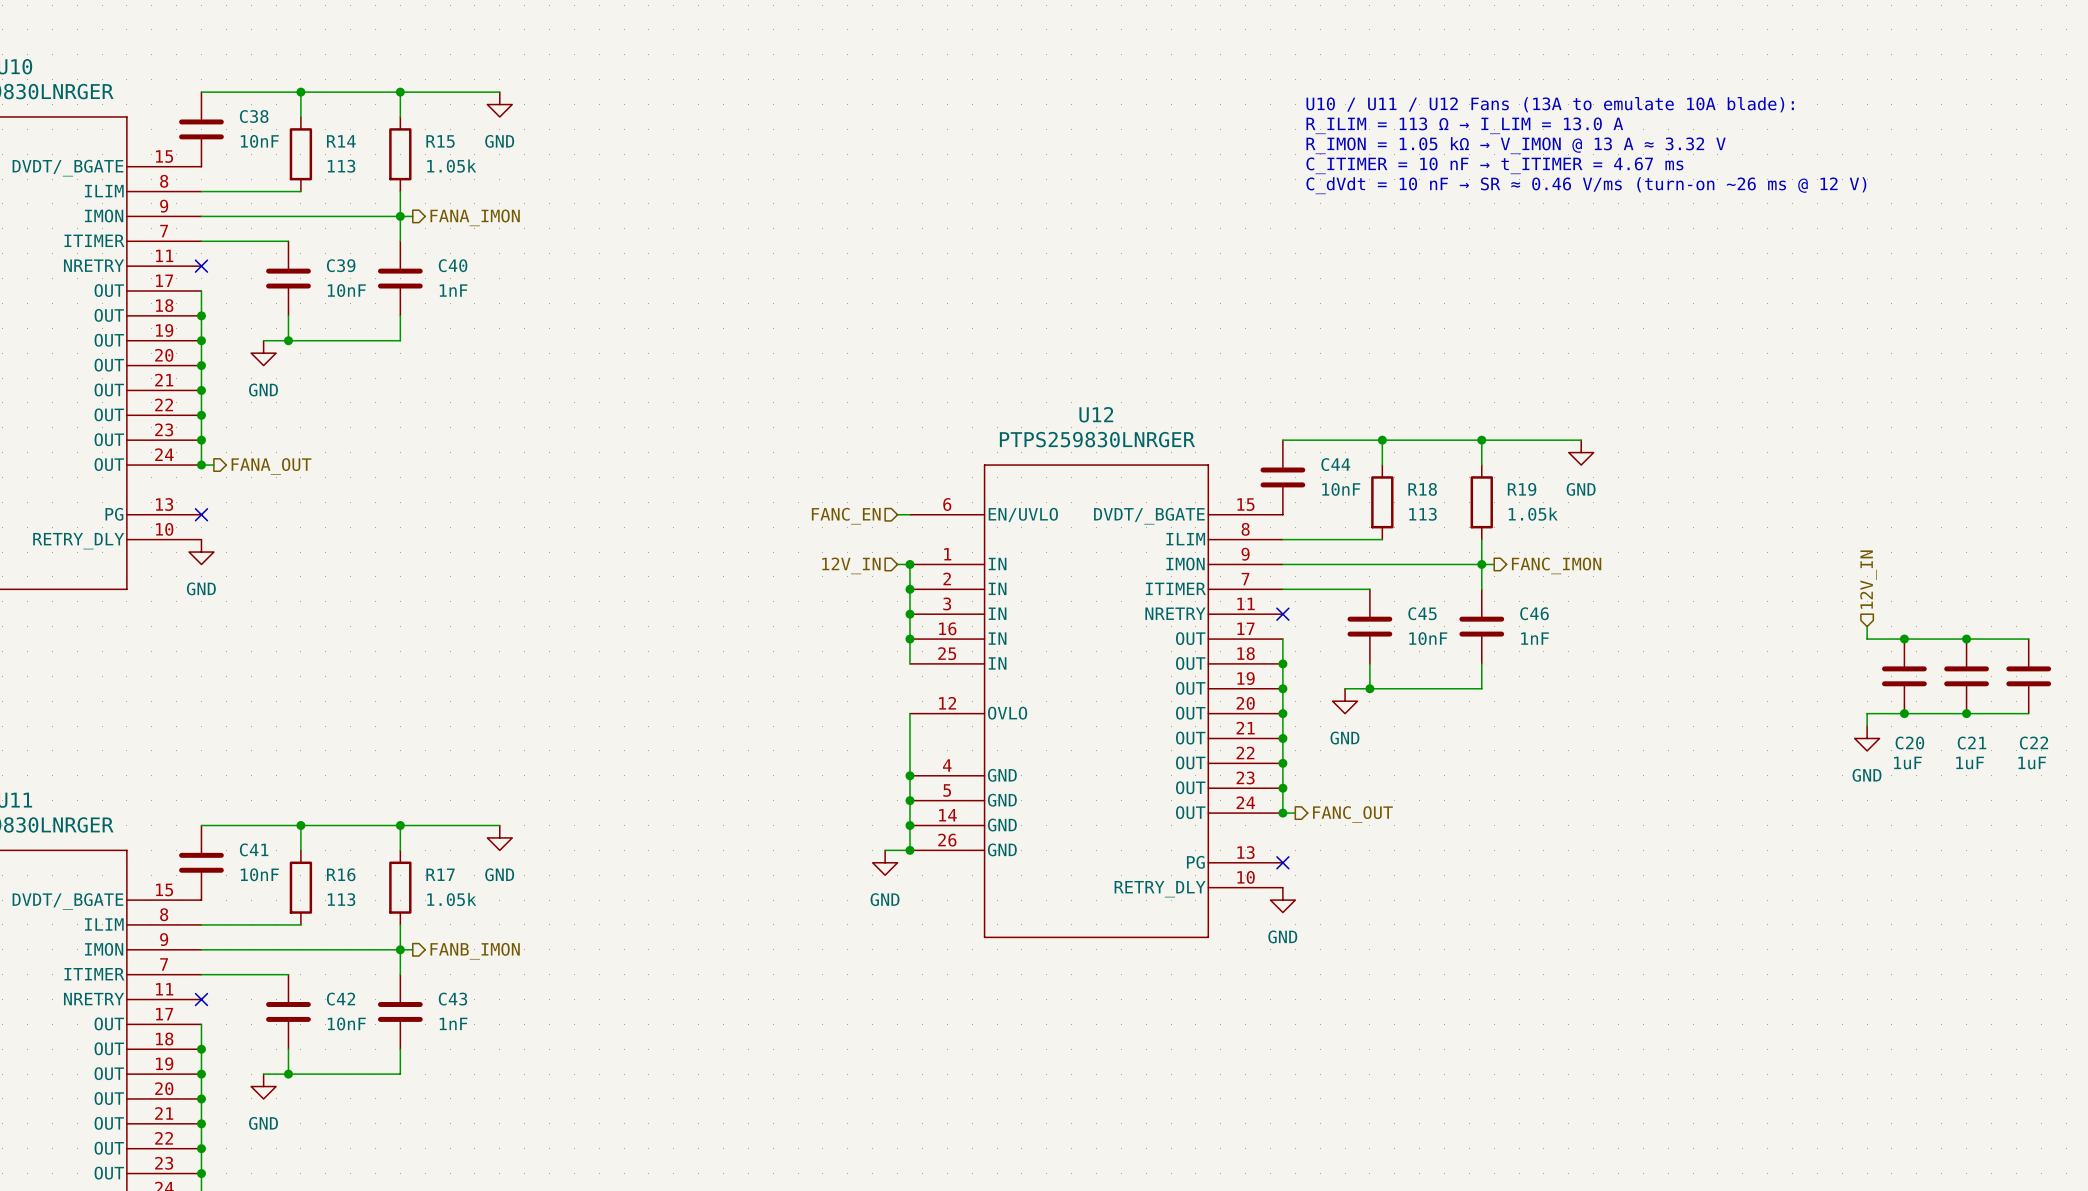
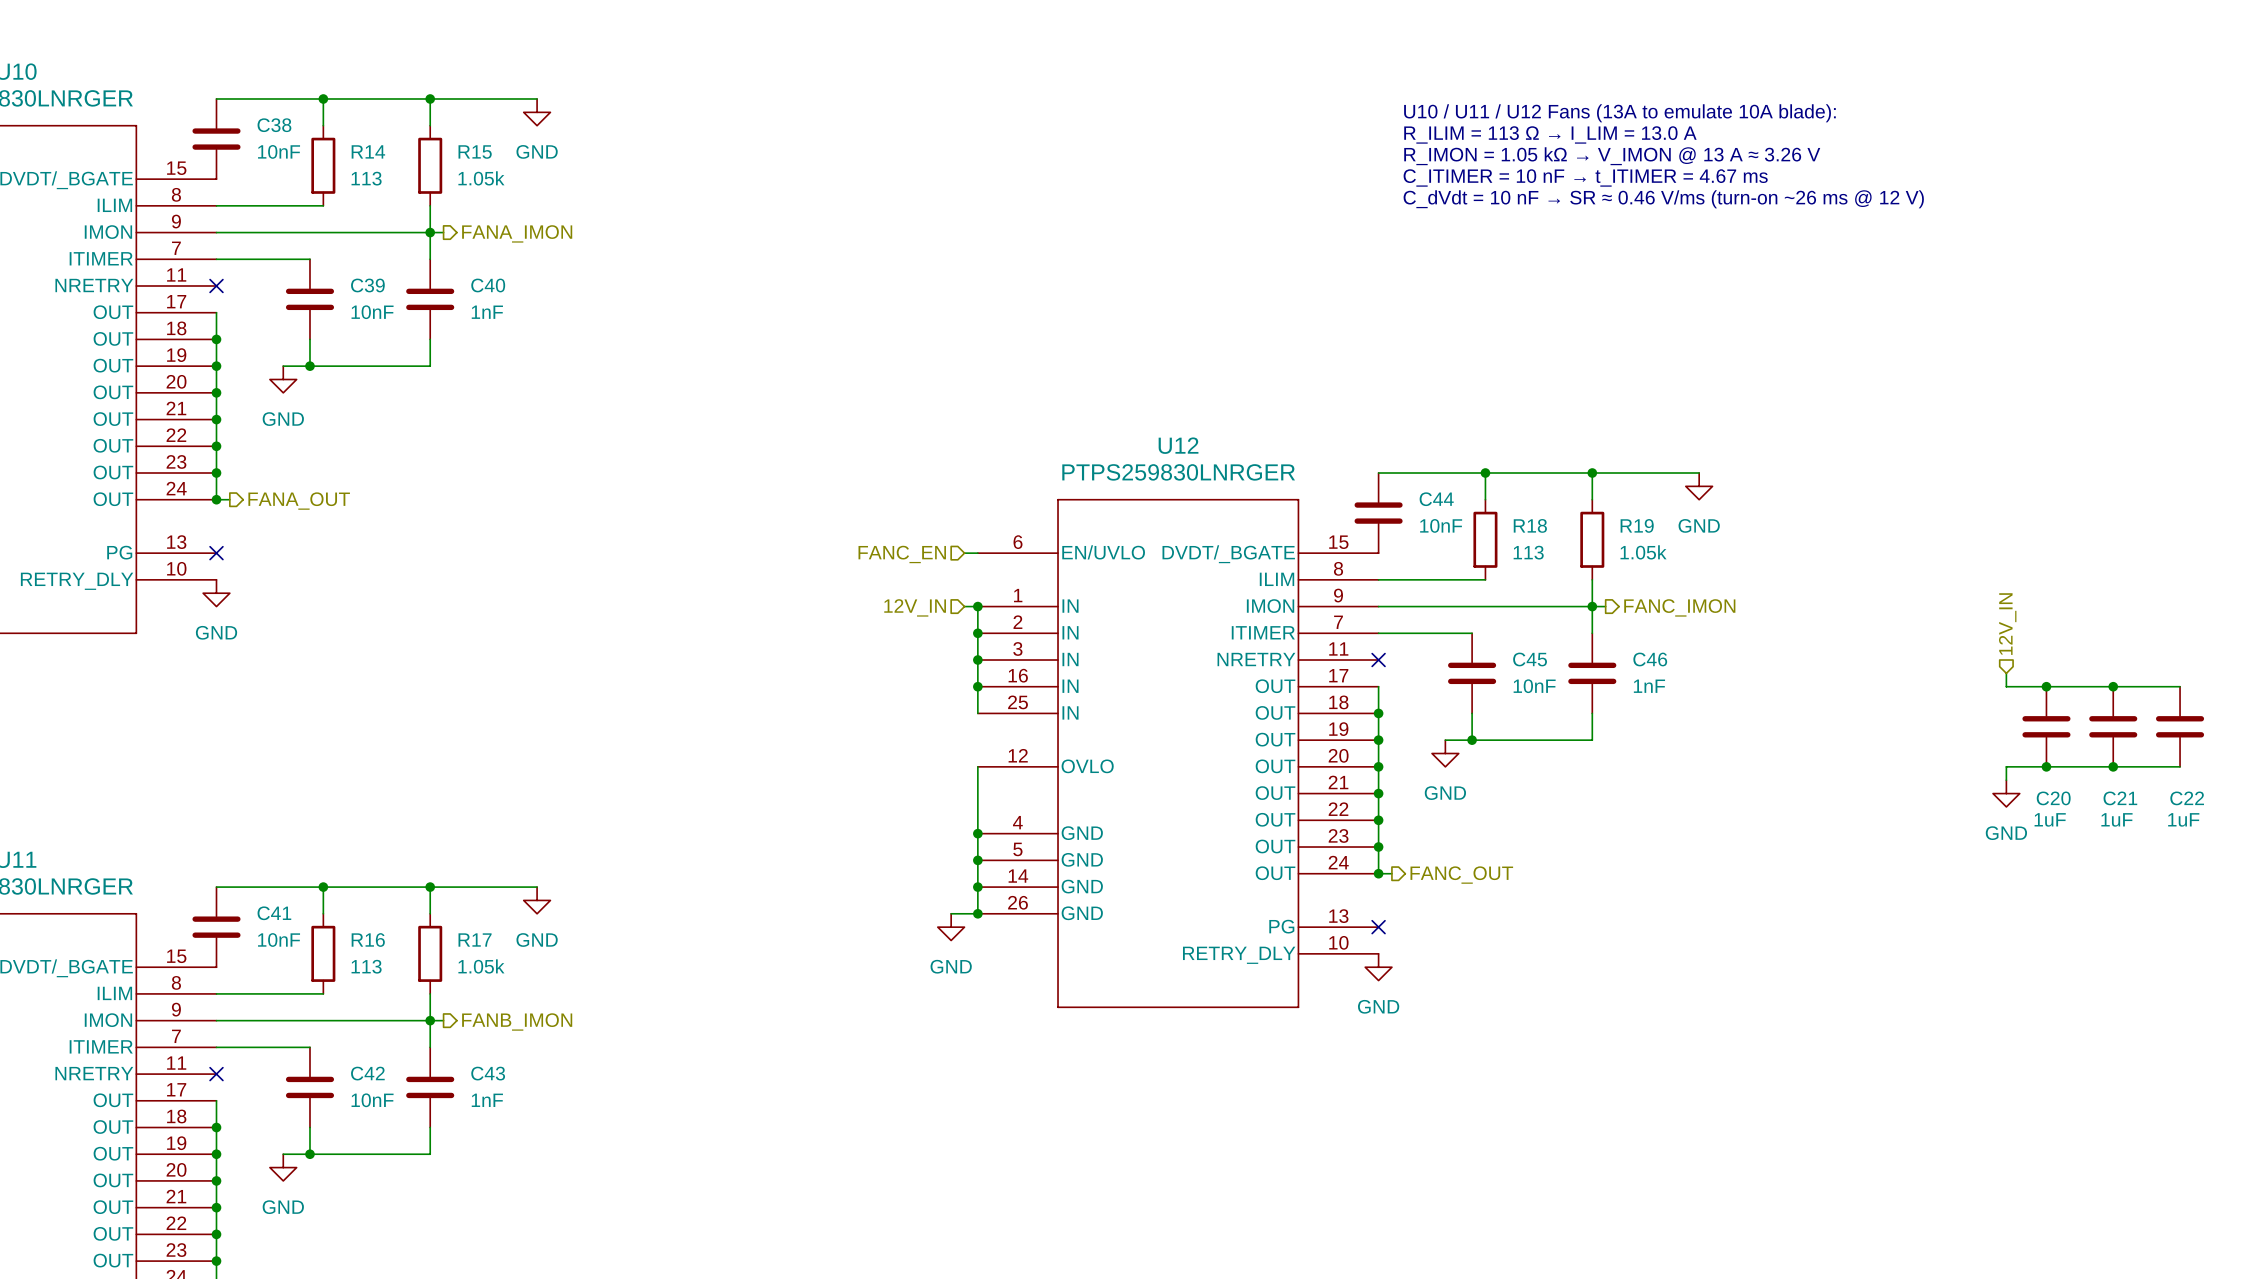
text: R_IMON = 1.05 kΩ → V_IMON @ 13 A ≈ 3.32 V (1516, 145) -> R_IMON = 1.05 kΩ → V_IMON @ 13 A ≈ 3.26 V (1612, 156)

